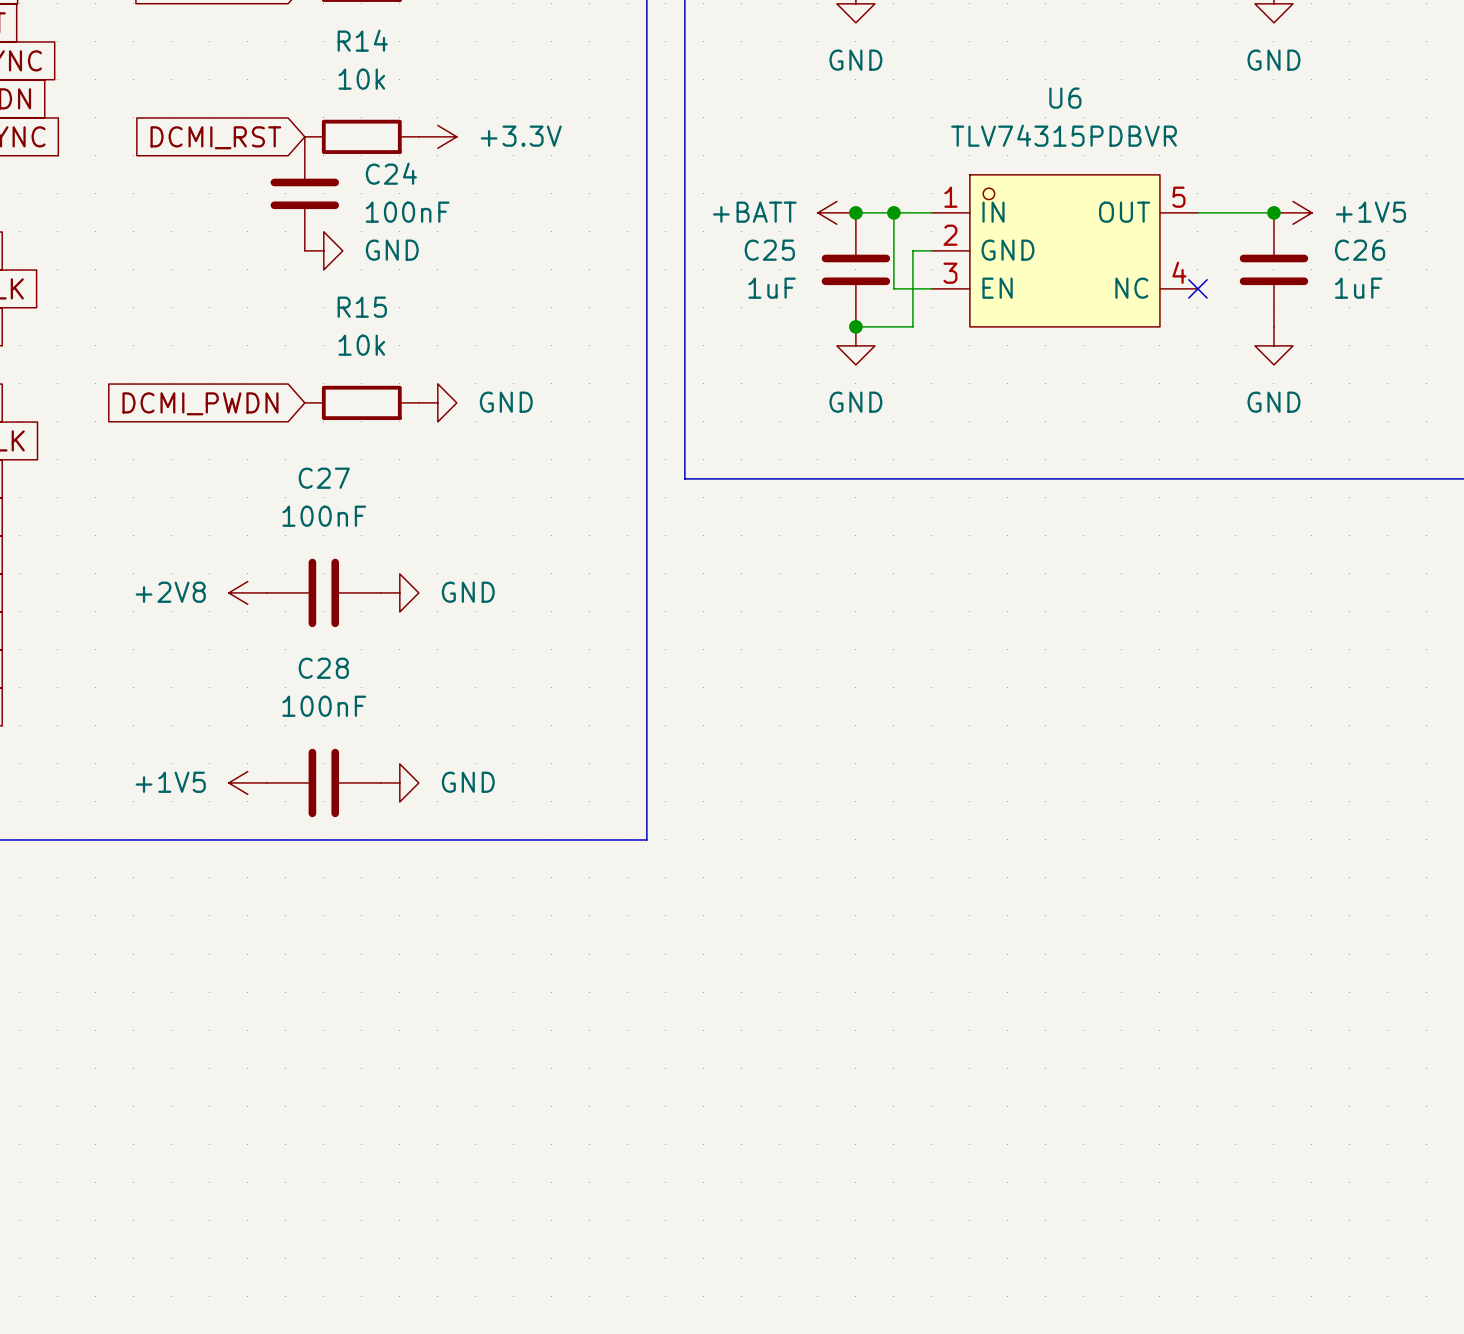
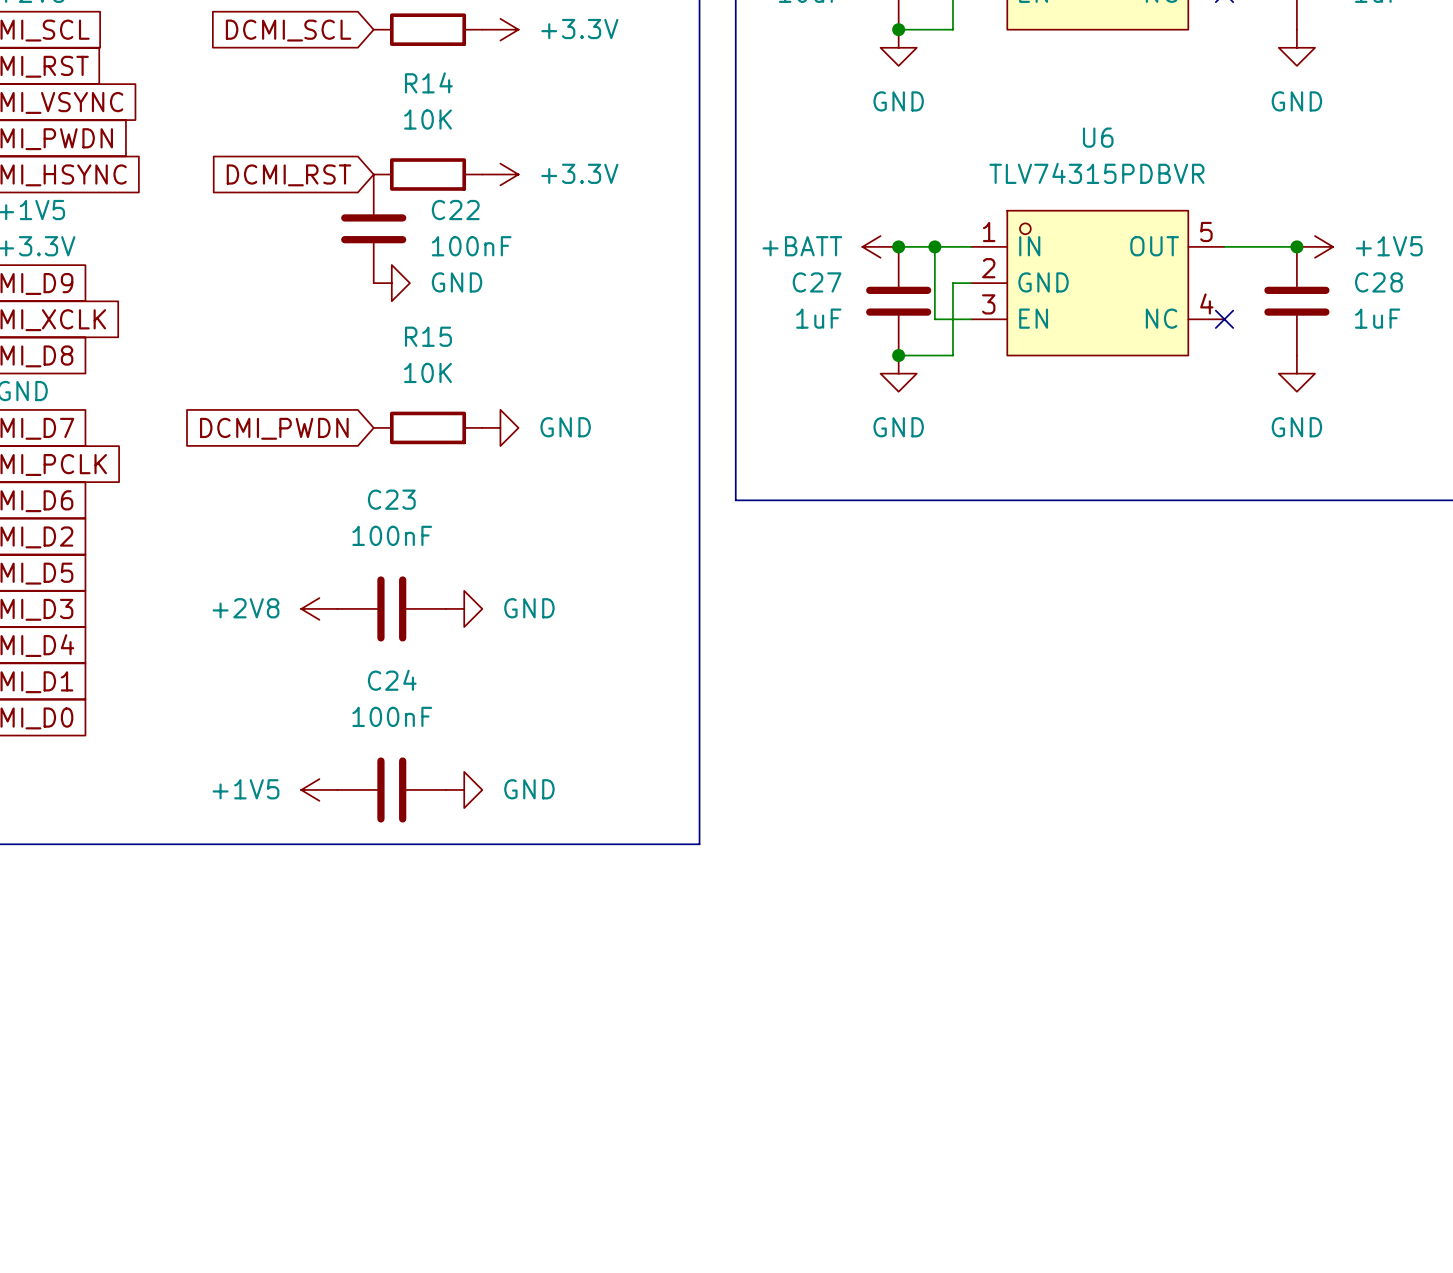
R14 value: 10k (361, 79) -> 10K (428, 119)
C24 name: C24 (391, 173) -> C22 (455, 210)
C25 name: C25 (769, 250) -> C27 (817, 282)
C26 name: C26 (1360, 250) -> C28 (1378, 282)
R15 value: 10k (361, 345) -> 10K (428, 372)
C27 name: C27 (324, 478) -> C23 (391, 499)
C28 name: C28 (323, 668) -> C24 (392, 680)

